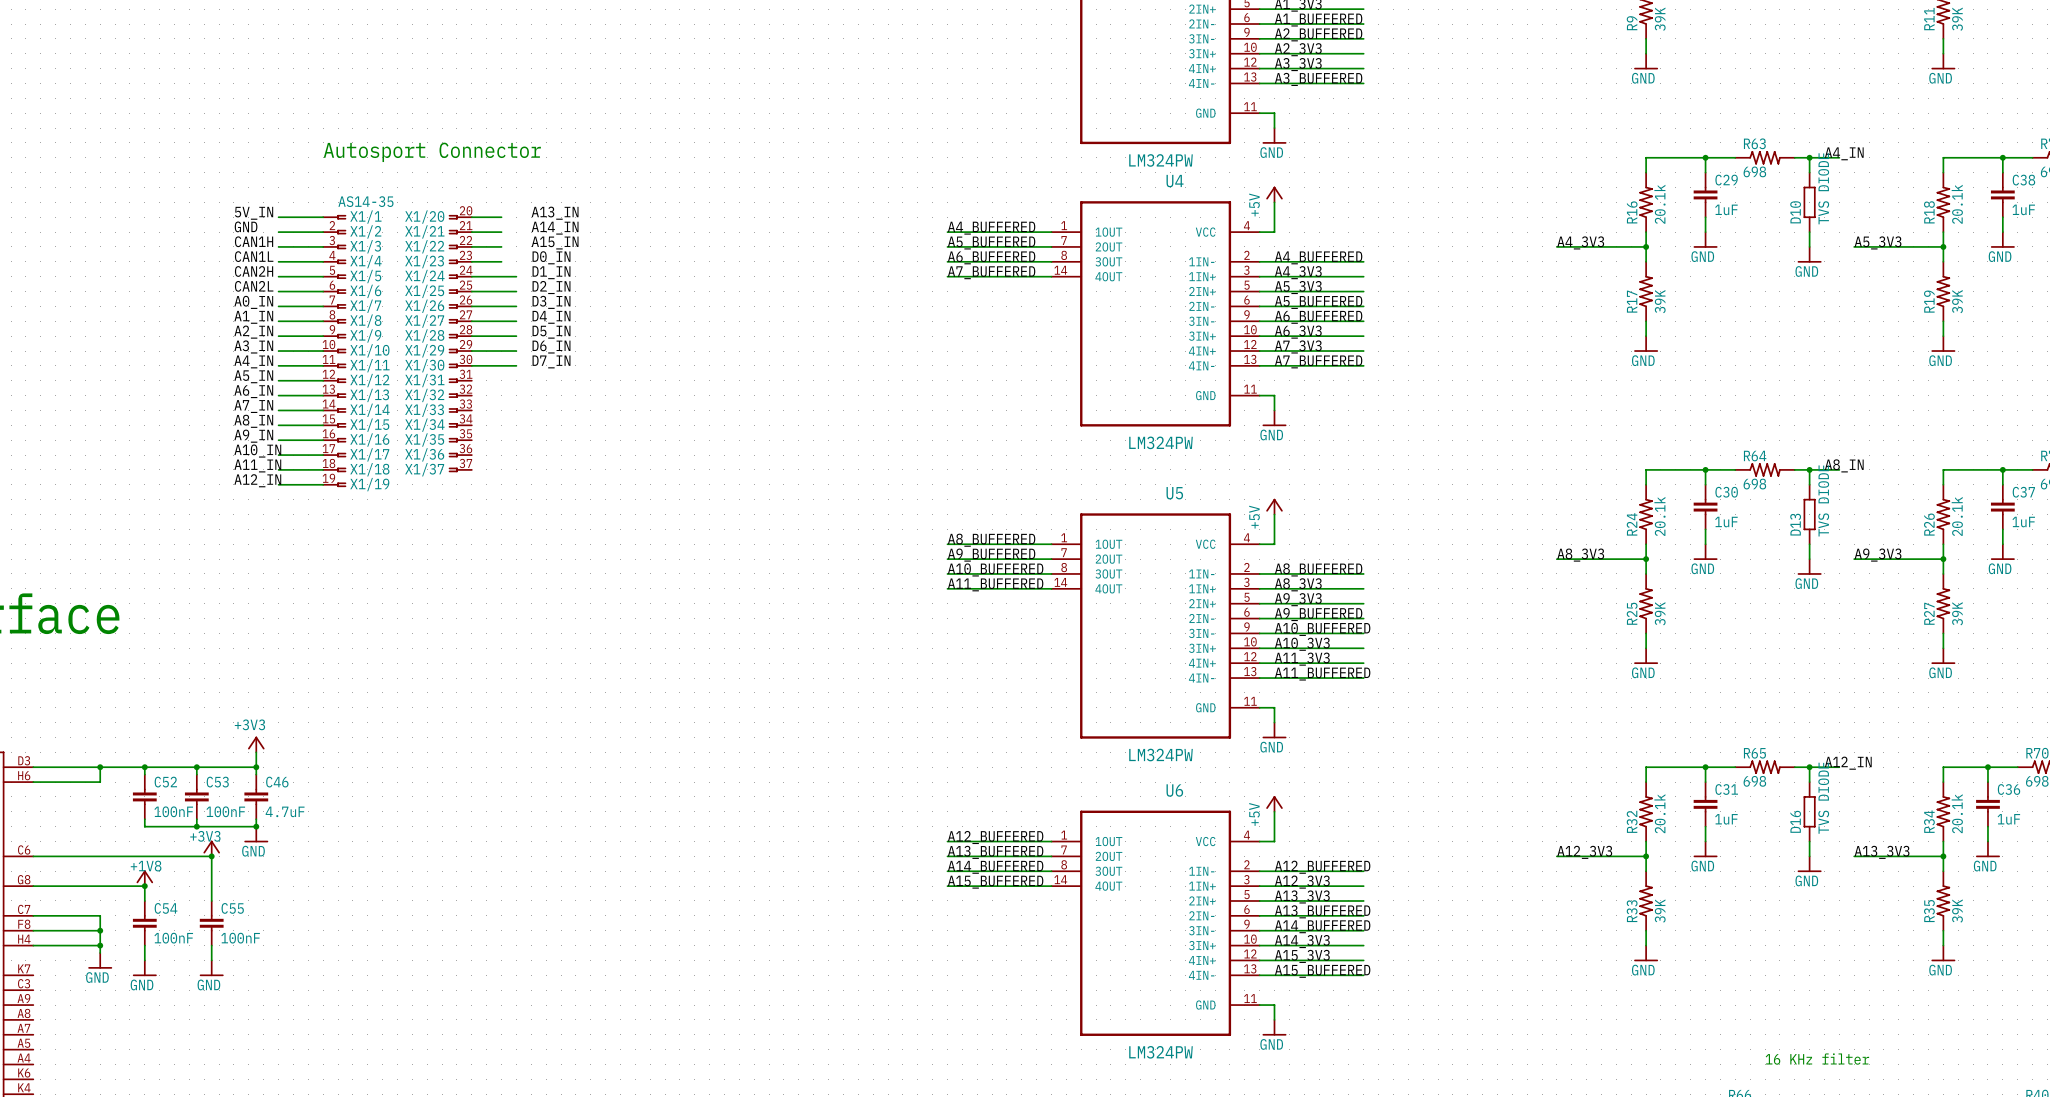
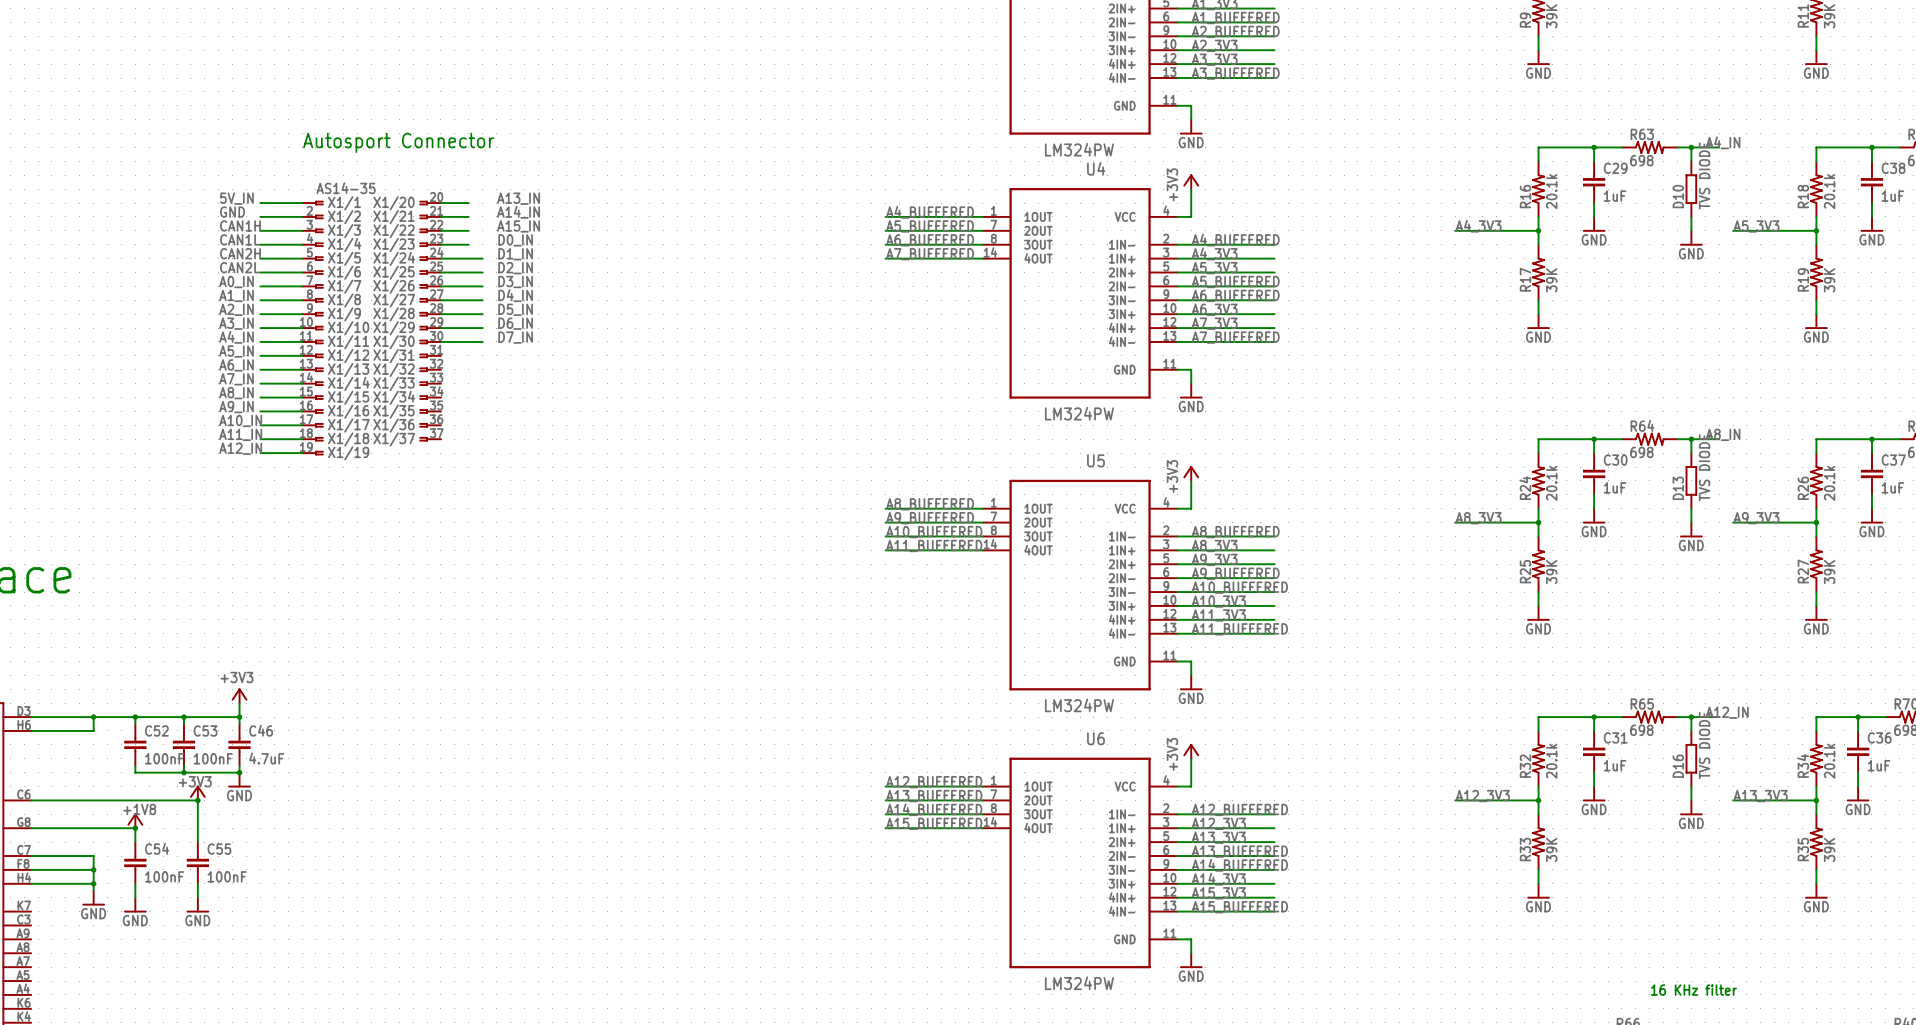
power symbol: +5V (1274, 194) -> +3V3 (1191, 181)
power symbol: +5V (1274, 506) -> +3V3 (1191, 473)
power symbol: +5V (1274, 804) -> +3V3 (1191, 751)

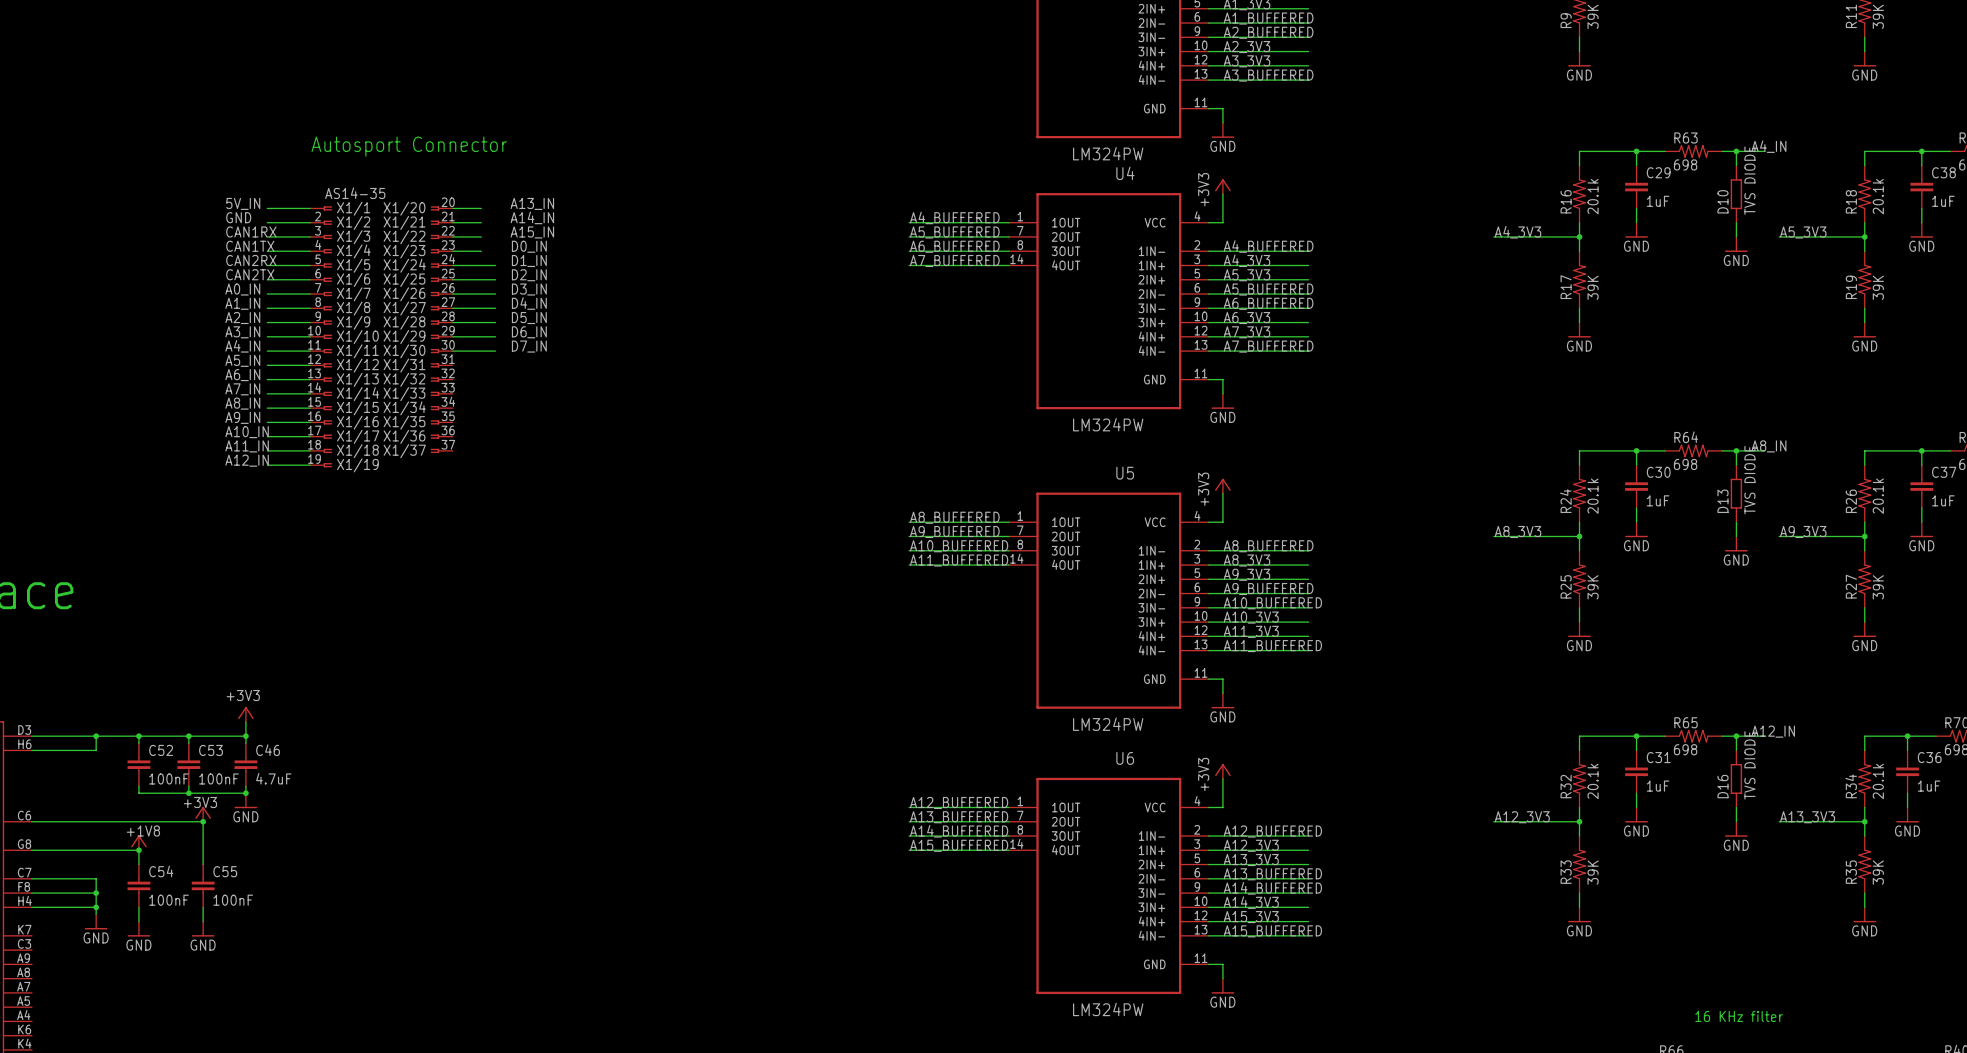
label: CAN1H (240, 225) -> CAN1RX (251, 231)
label: CAN1L (240, 239) -> CAN1TX (250, 246)
label: CAN2H (240, 253) -> CAN2RX (251, 260)
label: CAN2L (240, 267) -> CAN2TX (250, 274)

